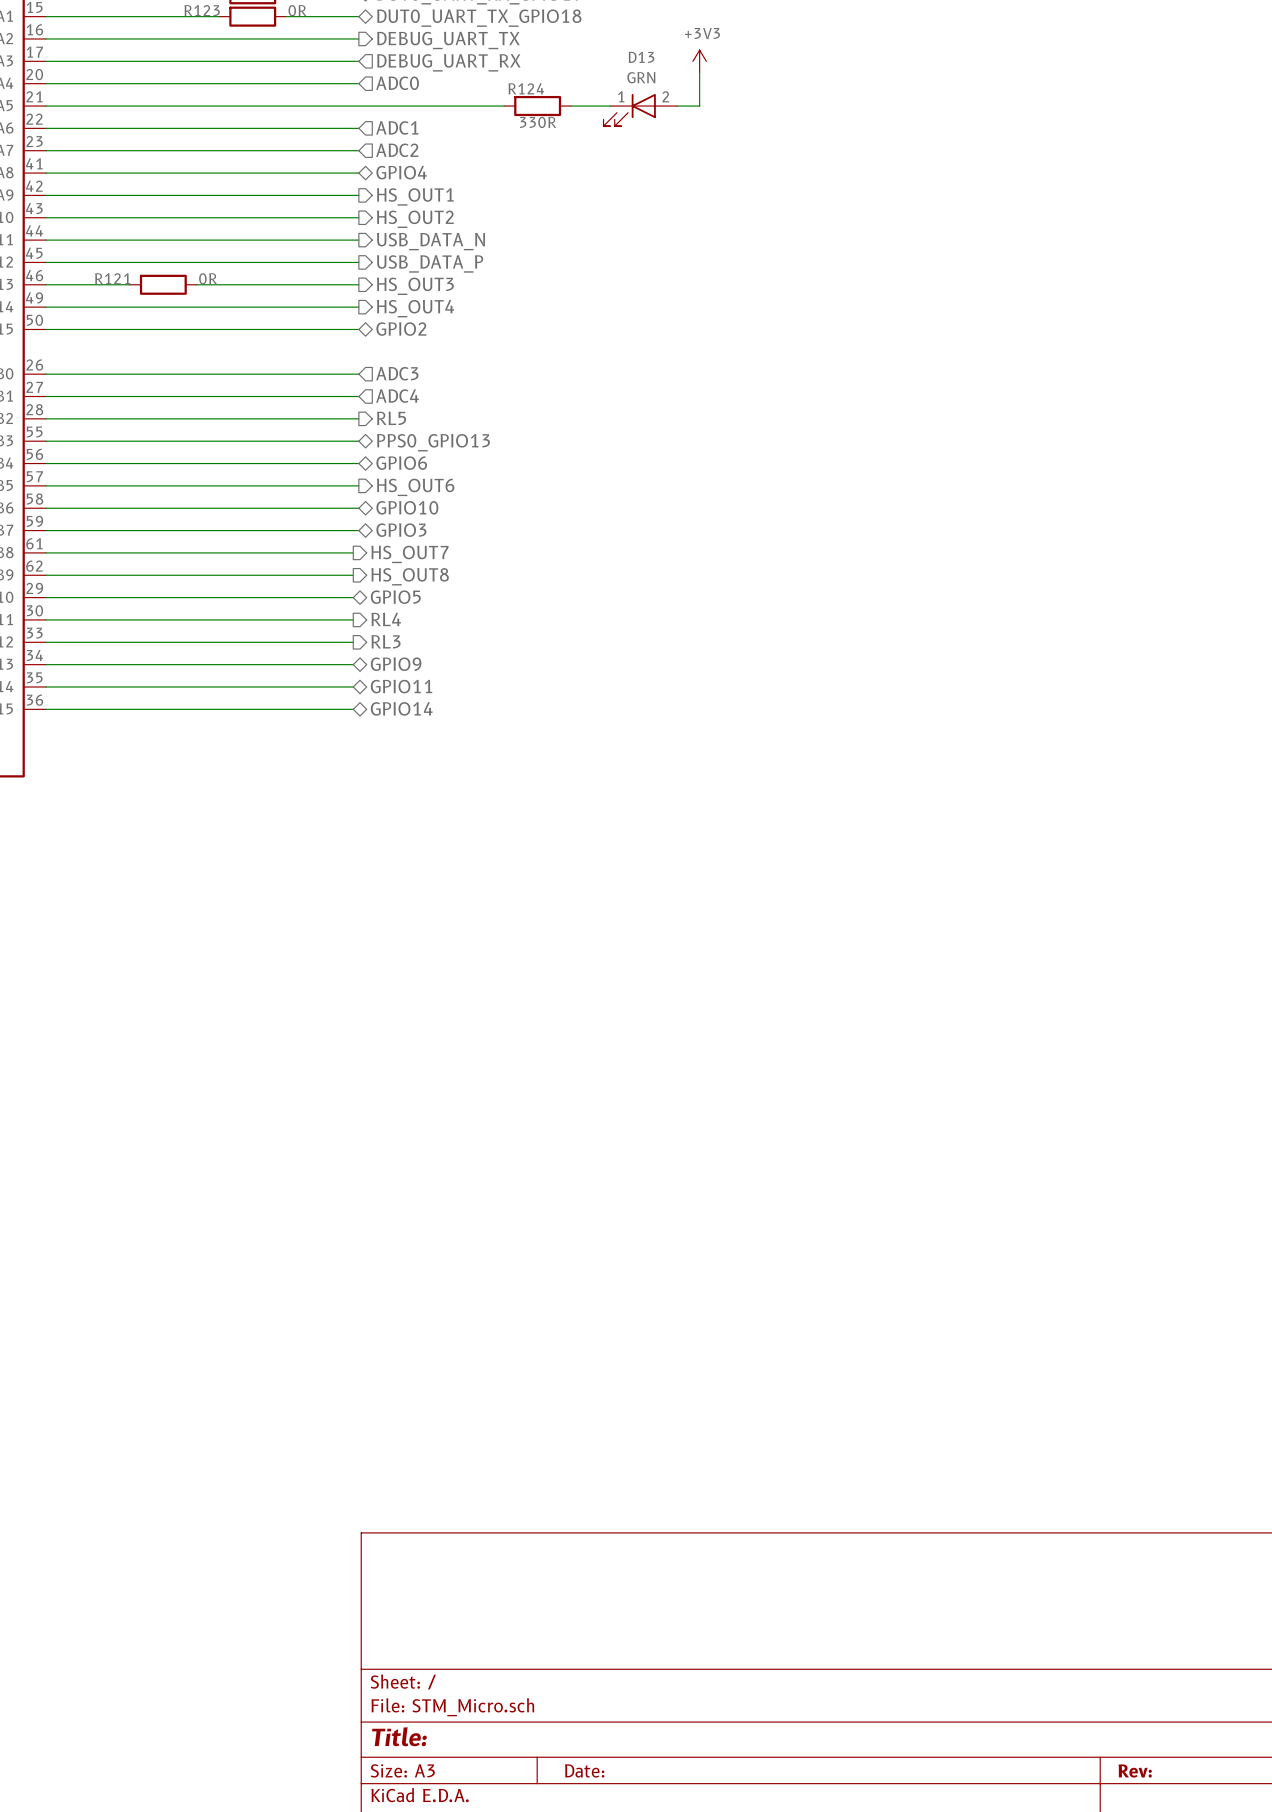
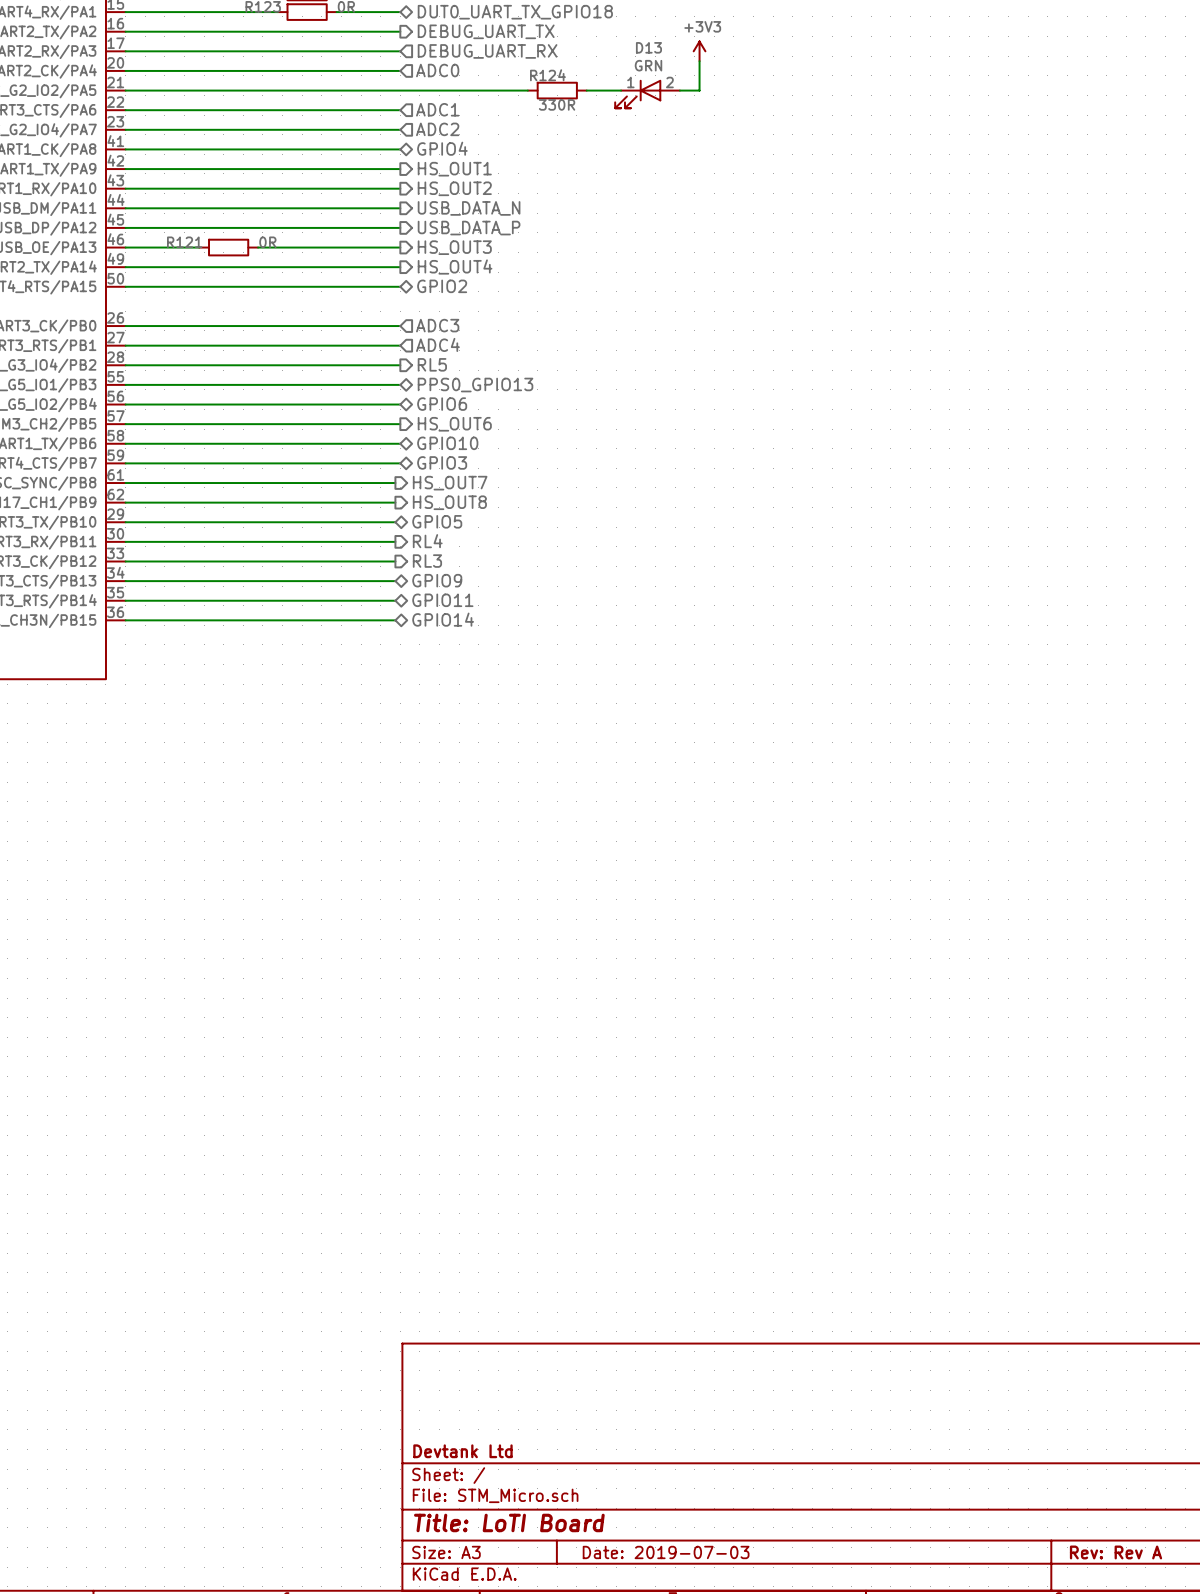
title block: none -> Devtank Ltd (462, 1451)
title block: Title: (399, 1736) -> Title: LoTI Board (509, 1522)
title block: Date: (584, 1770) -> Date: 2019-07-03 (666, 1552)
title block: Rev: (1135, 1771) -> Rev: Rev A (1116, 1552)

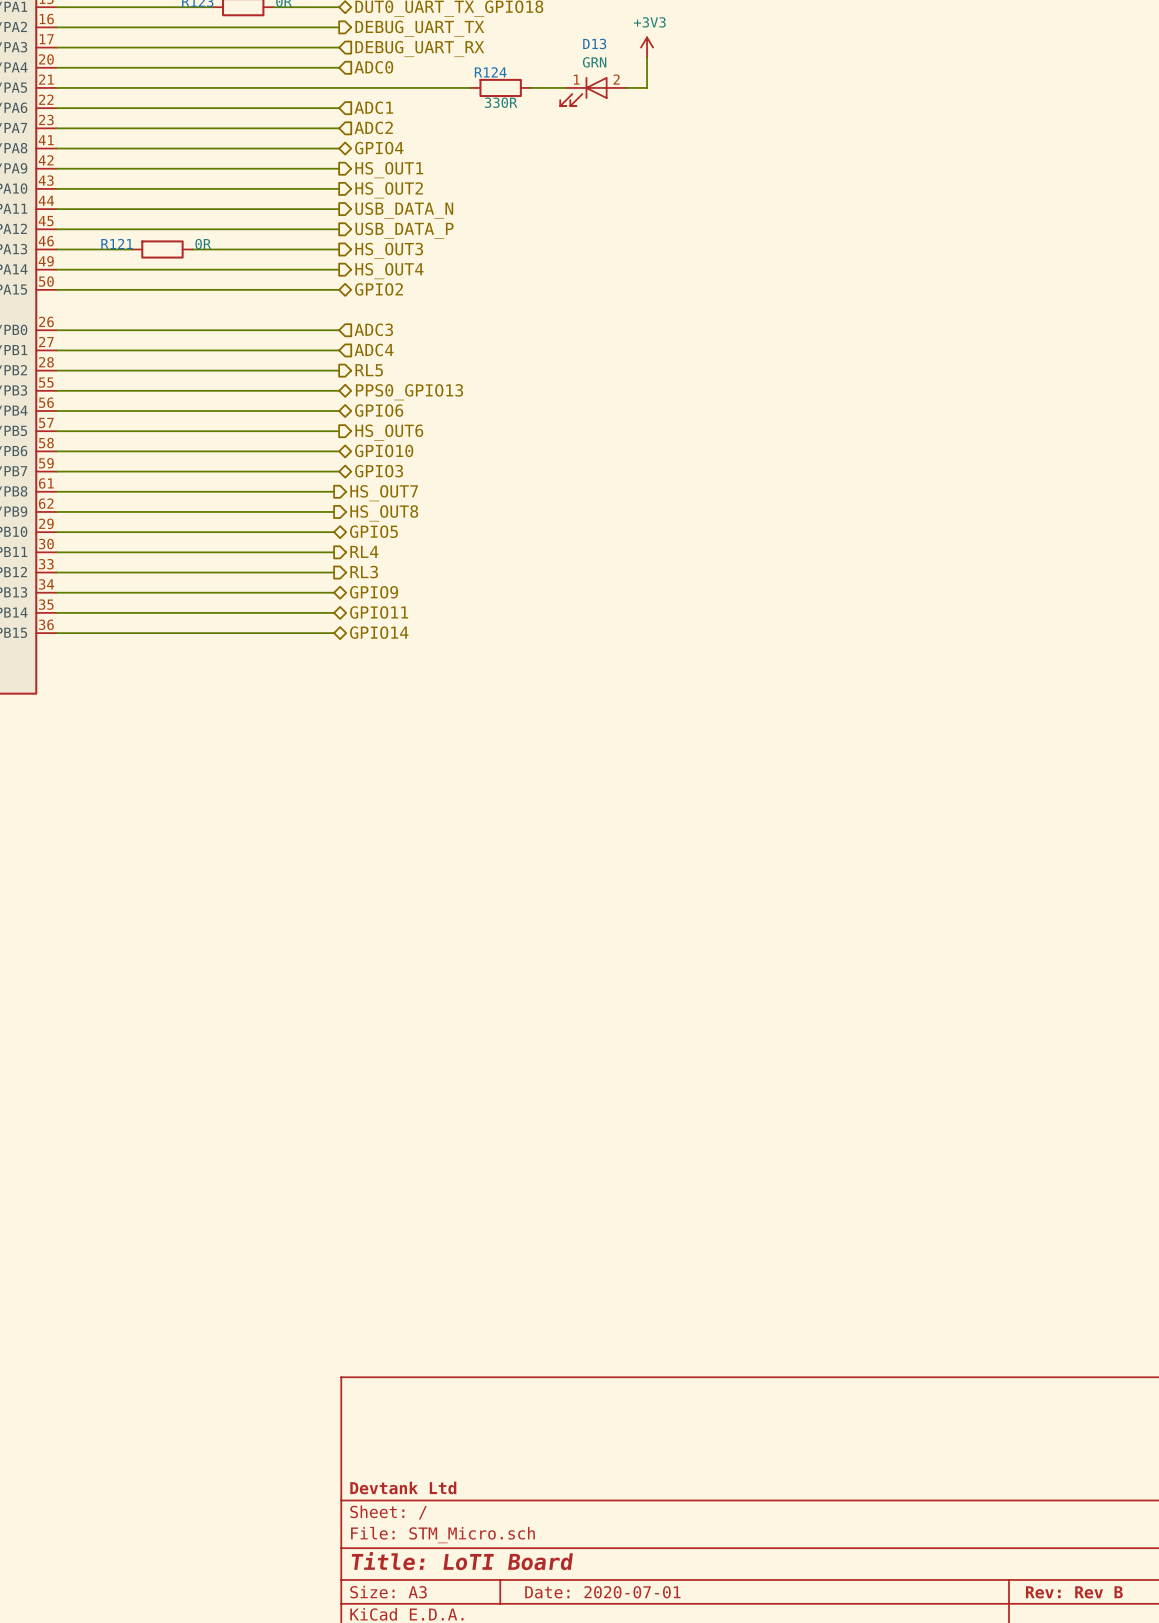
title block: Date: 2019-07-03 (666, 1552) -> Date: 2020-07-01 (602, 1592)
title block: Rev: Rev A (1116, 1552) -> Rev: Rev B (1074, 1592)

